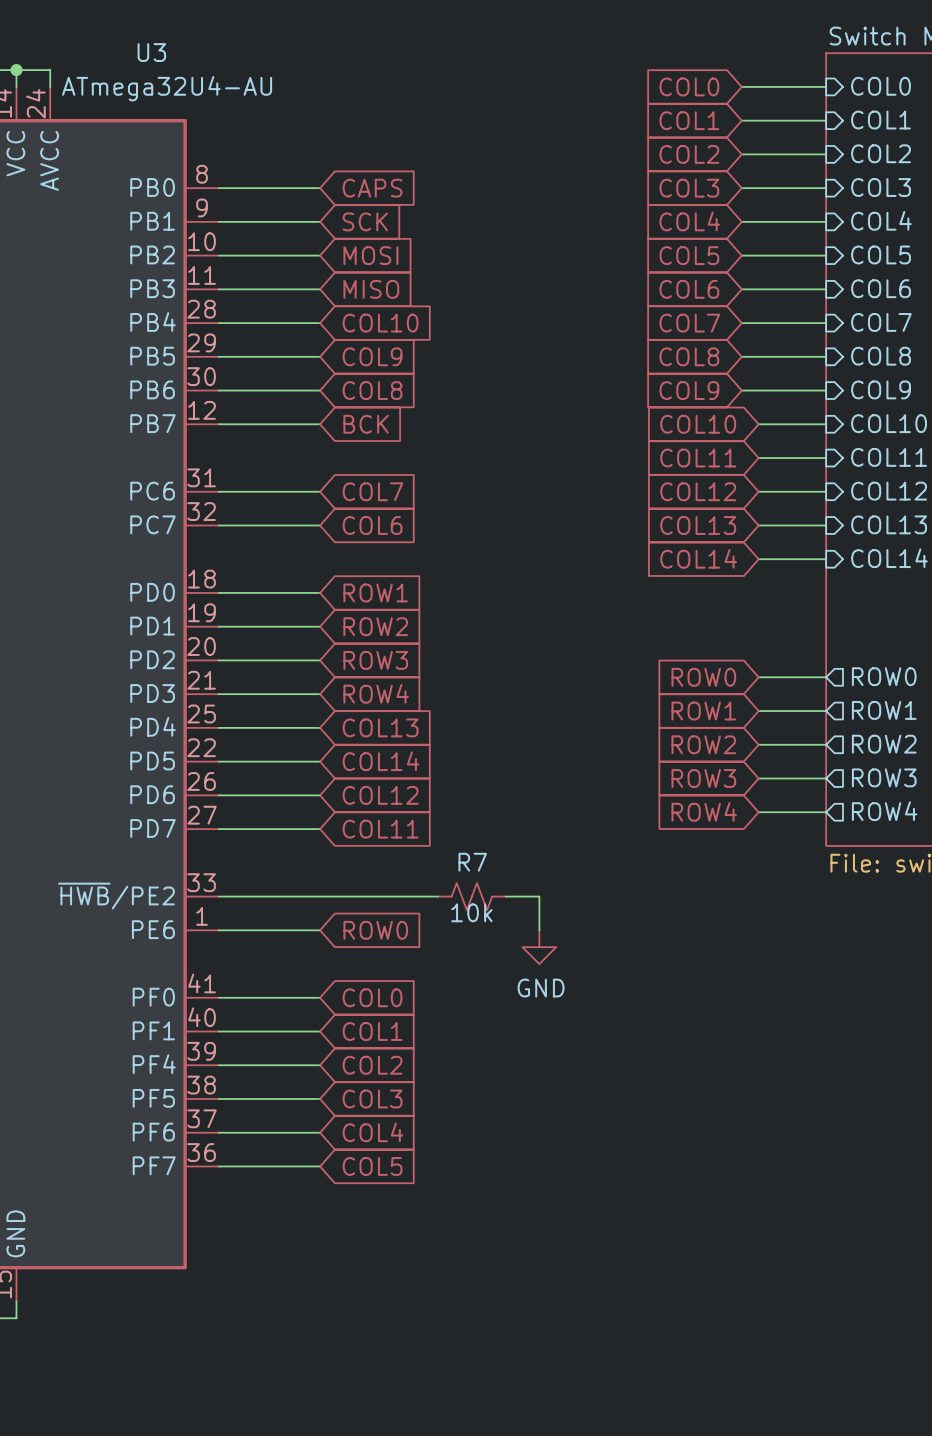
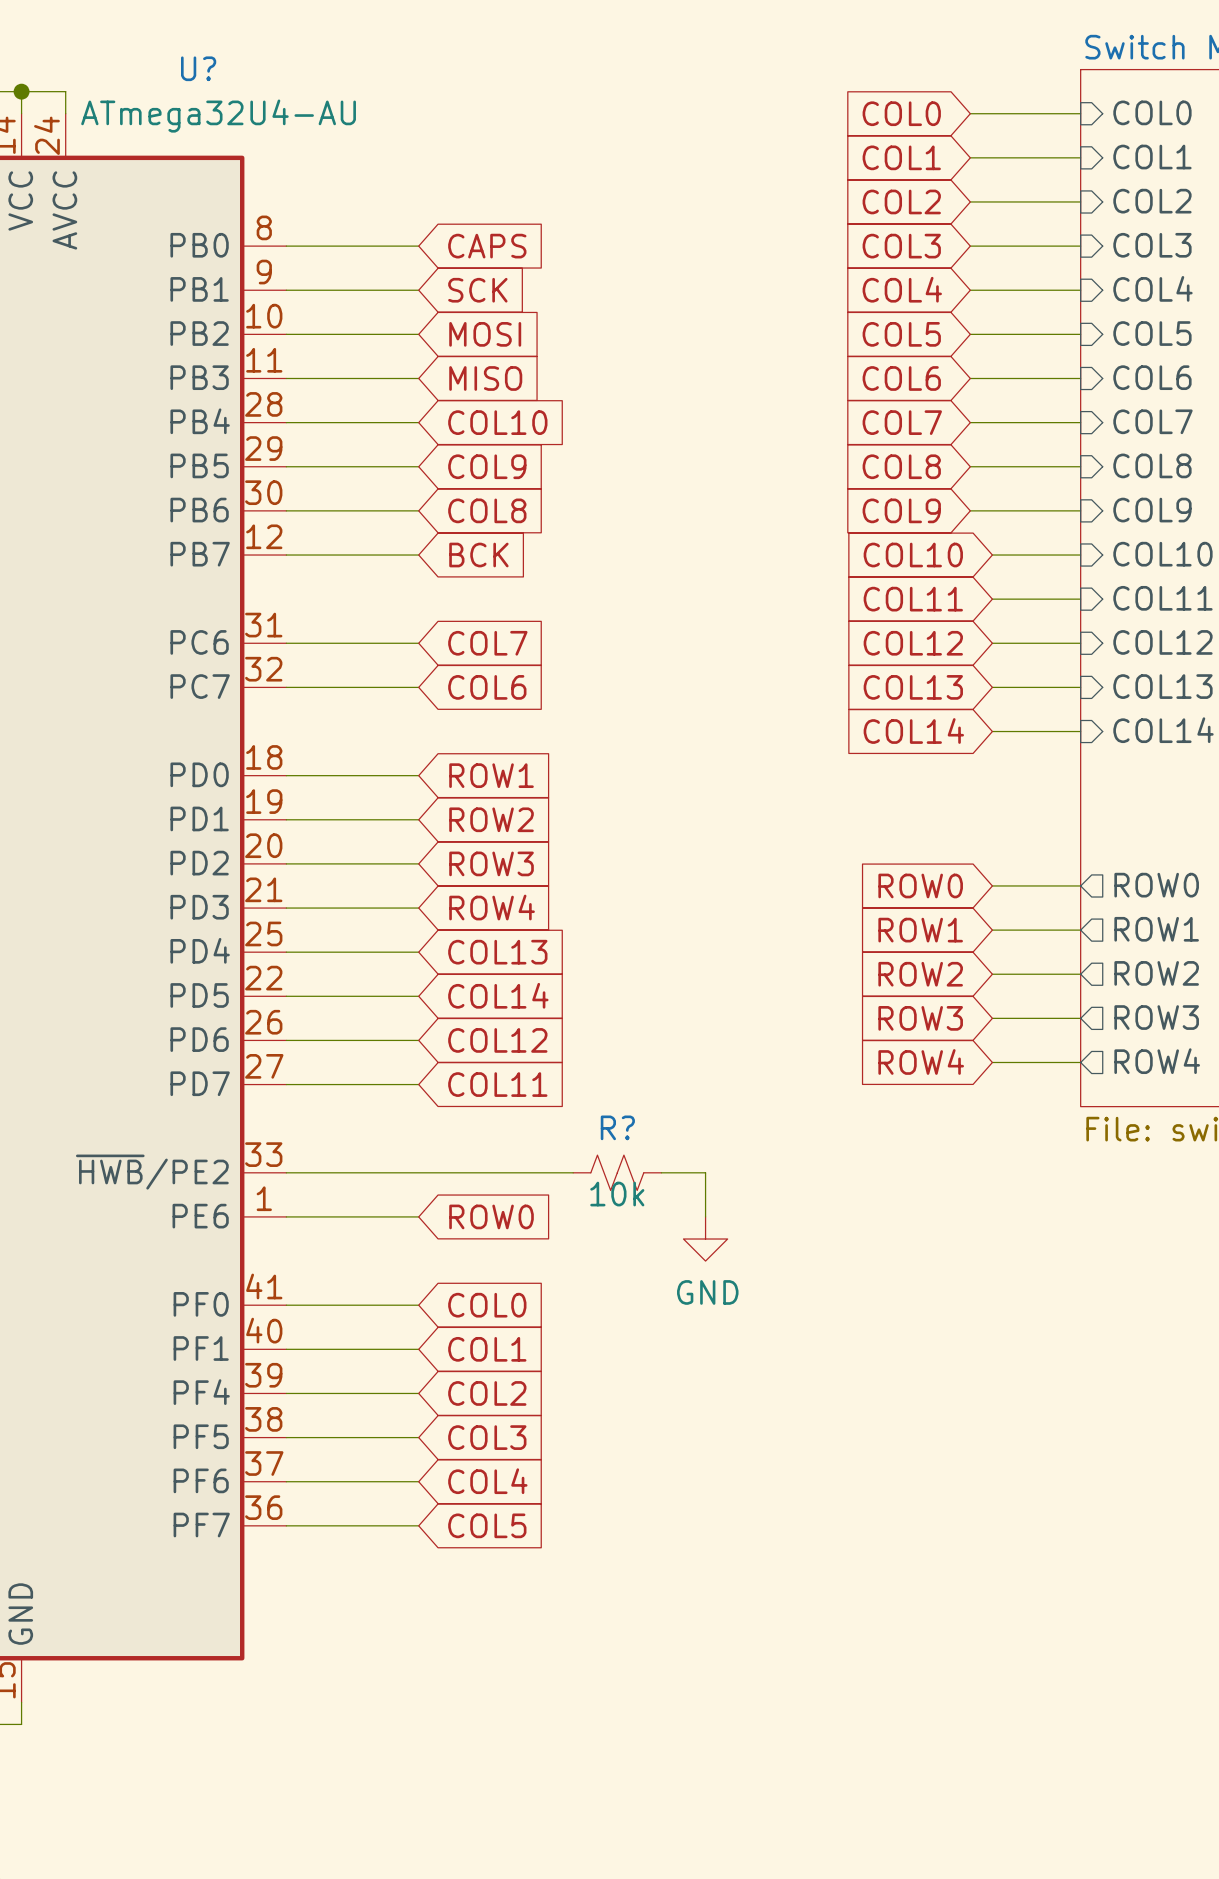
U3 name: U3 (151, 52) -> U? (198, 68)
R7 name: R7 (472, 862) -> R? (617, 1127)

